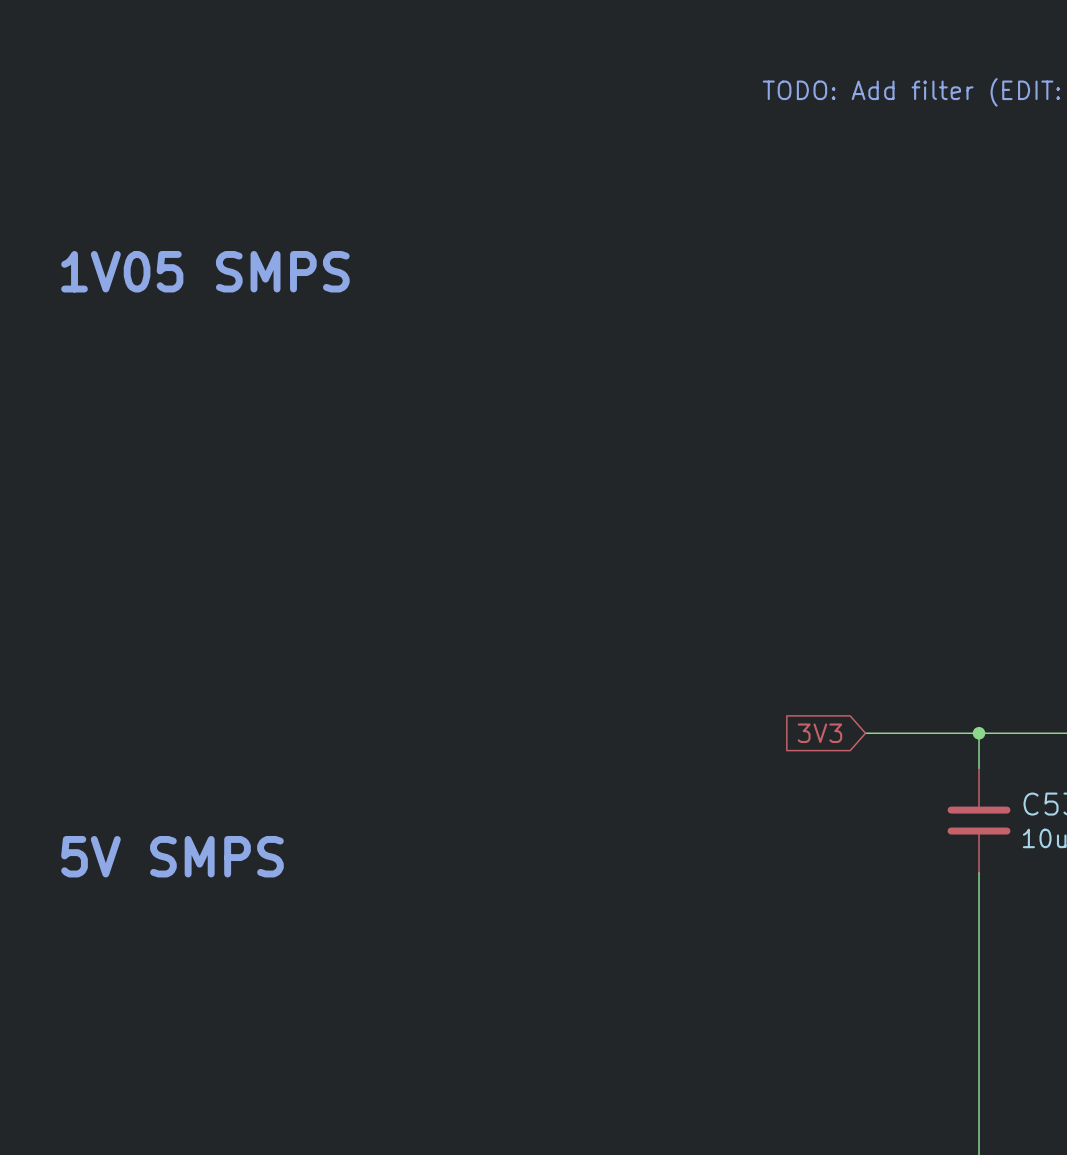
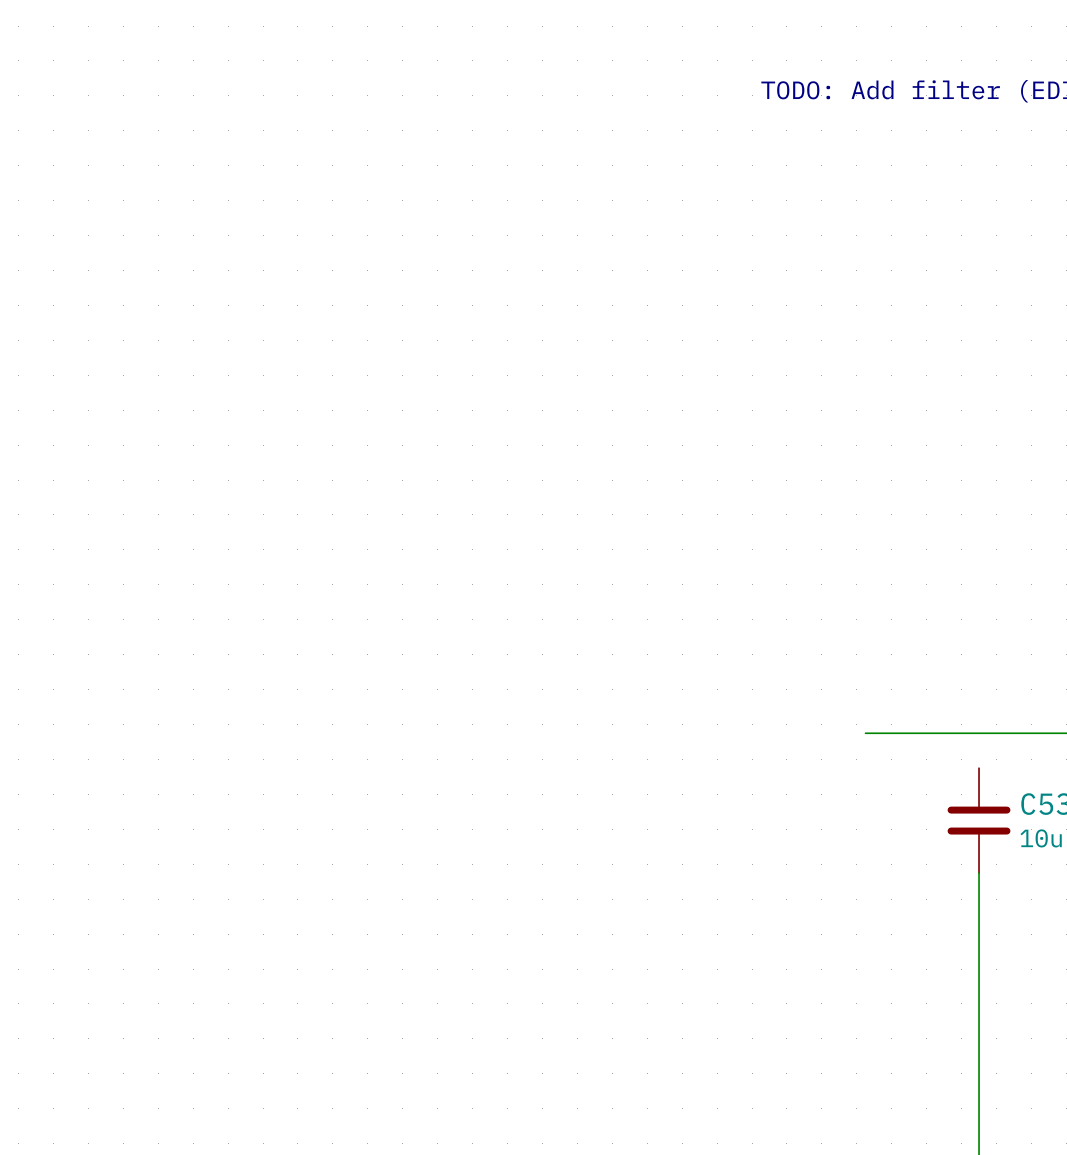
text: 1V05 SMPS (205, 271) -> none
global label: 3V3 (819, 733) -> none
wire: (979, 733) (979, 768) -> none
junction: (979, 733) -> none
text: 5V SMPS (172, 856) -> none

